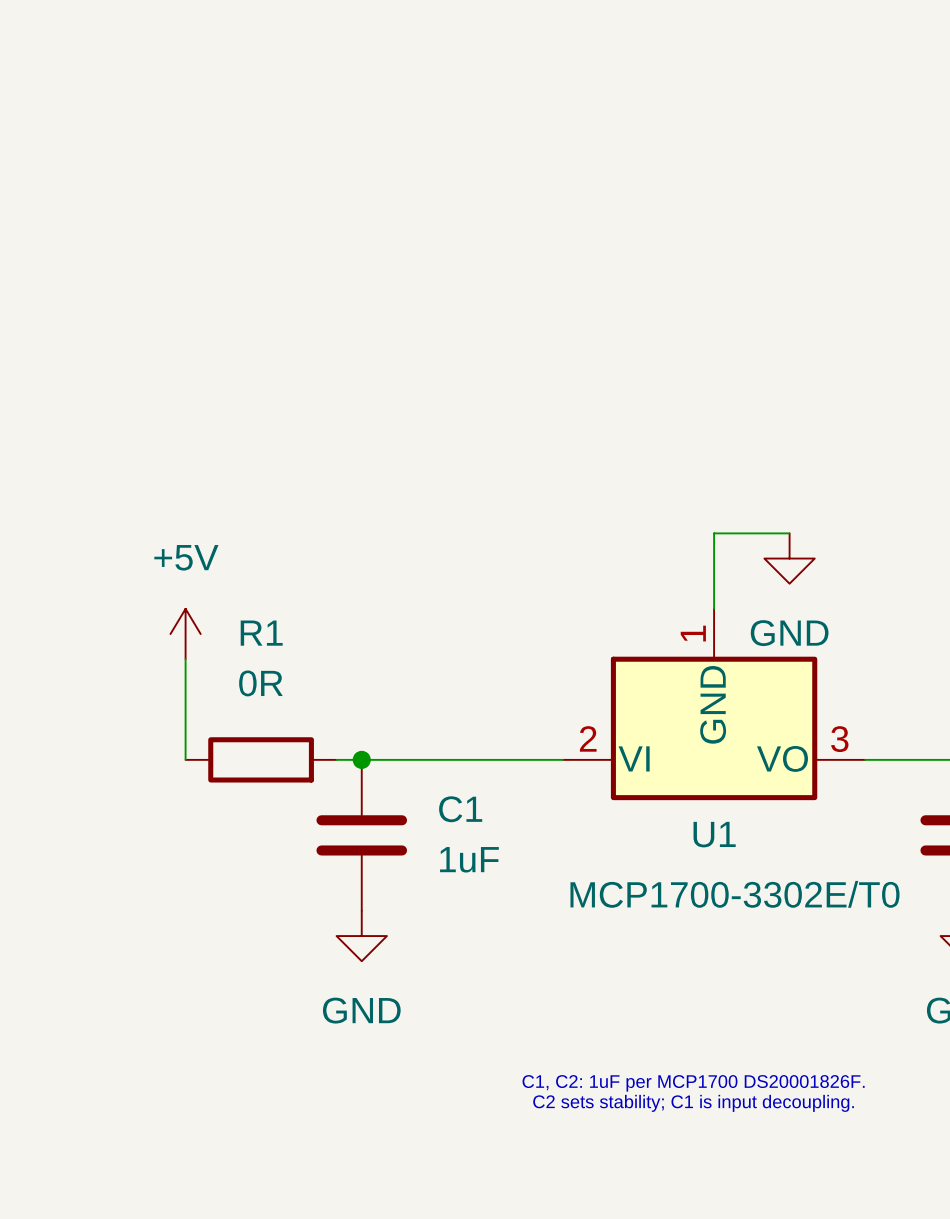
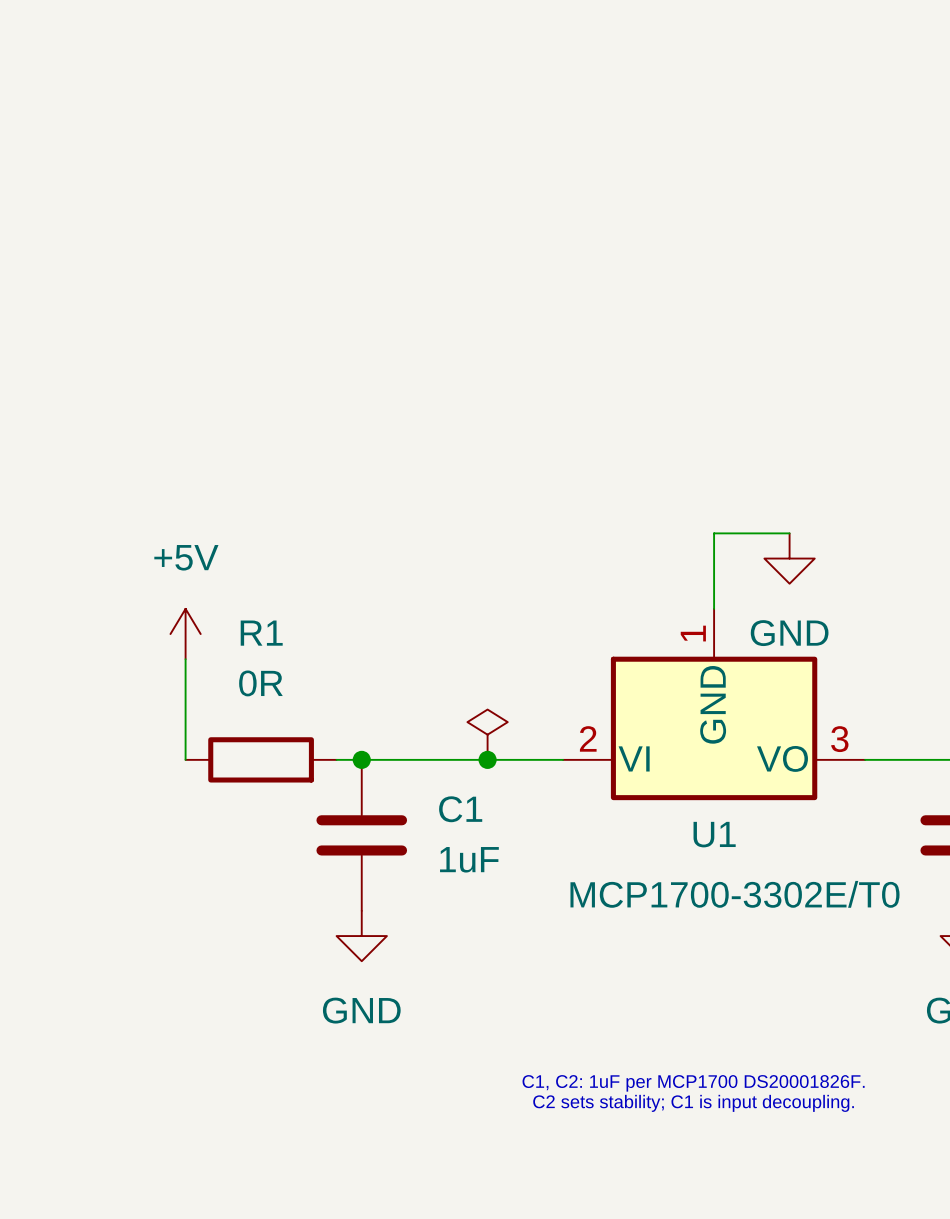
power symbol: none -> (487, 734)
junction: none -> (487, 759)

